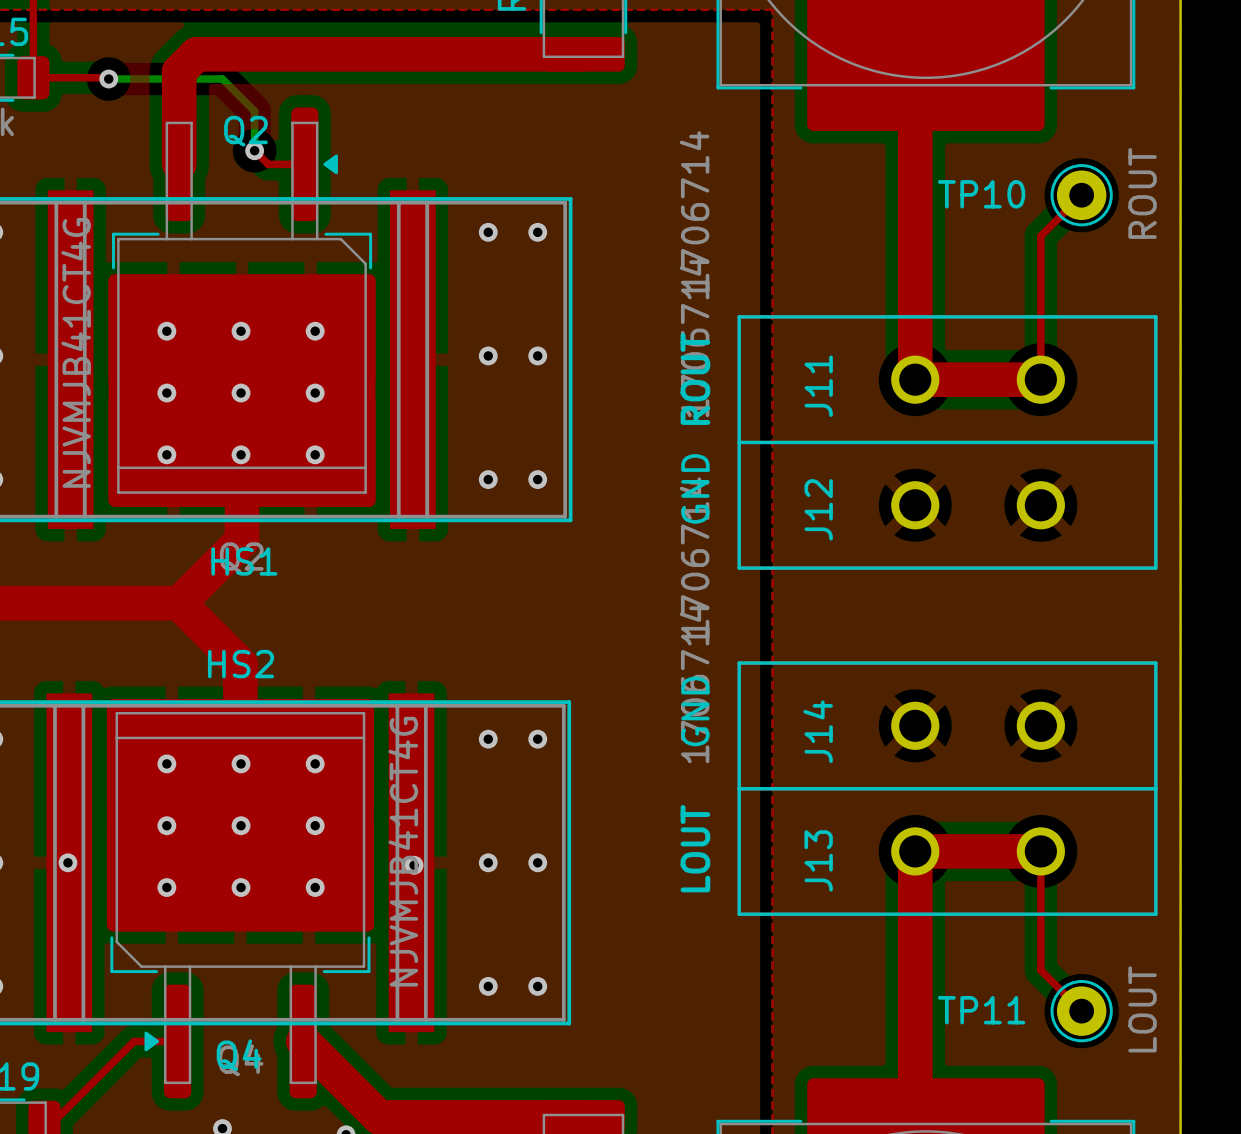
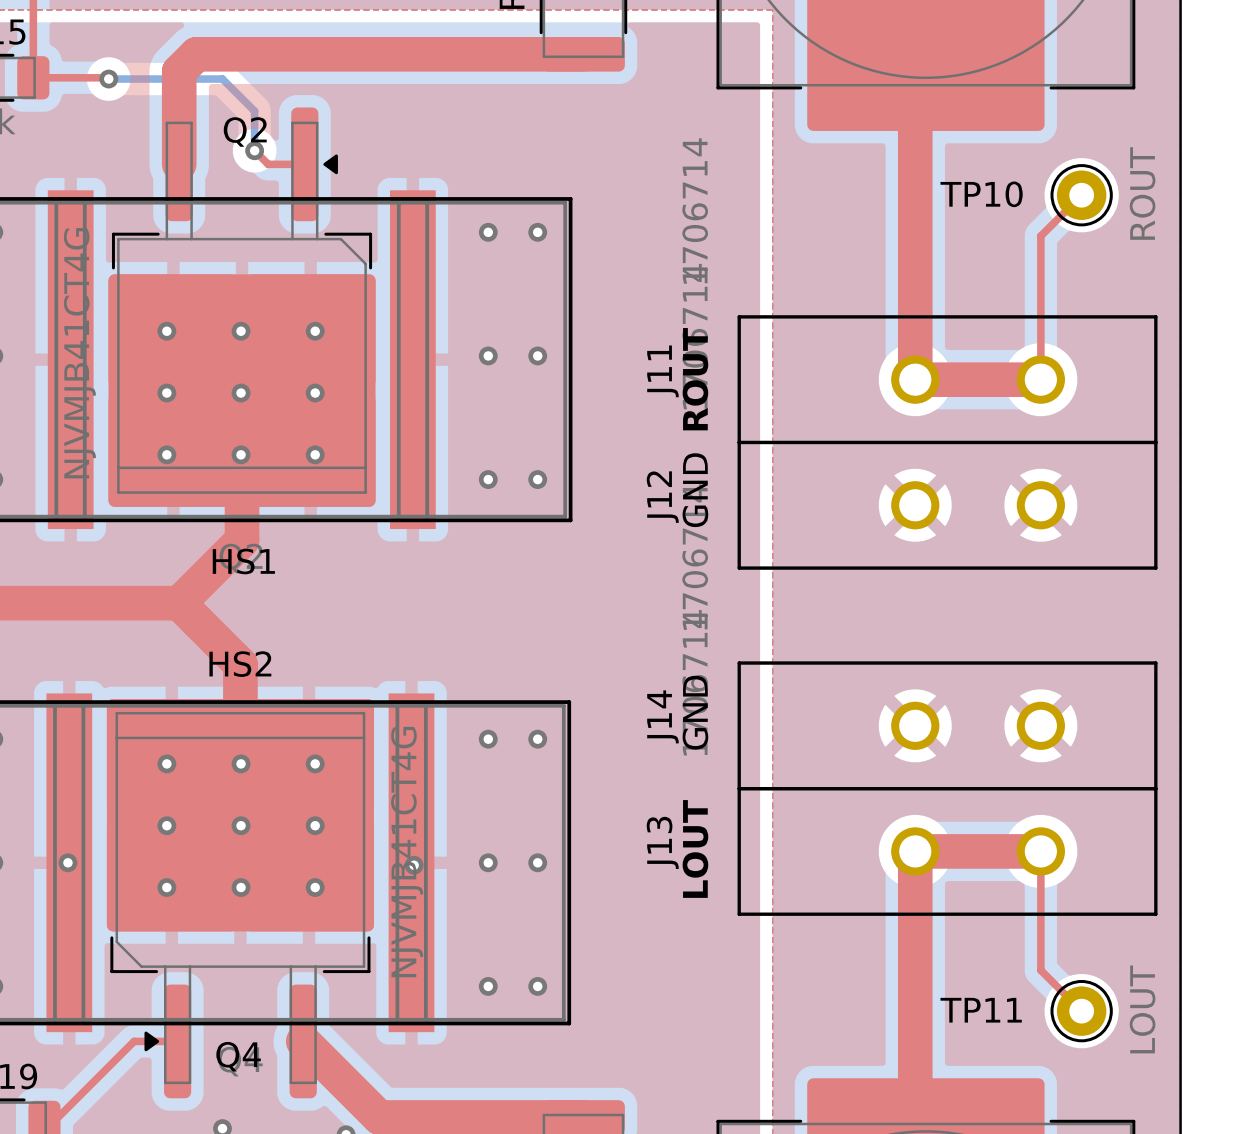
J11 name position: J11 (818, 386) -> J11 (662, 371)
J12 name position: J12 (818, 509) -> J12 (662, 497)
J14 name position: J14 (818, 731) -> J14 (662, 716)
J13 name position: J13 (818, 860) -> J13 (662, 842)

